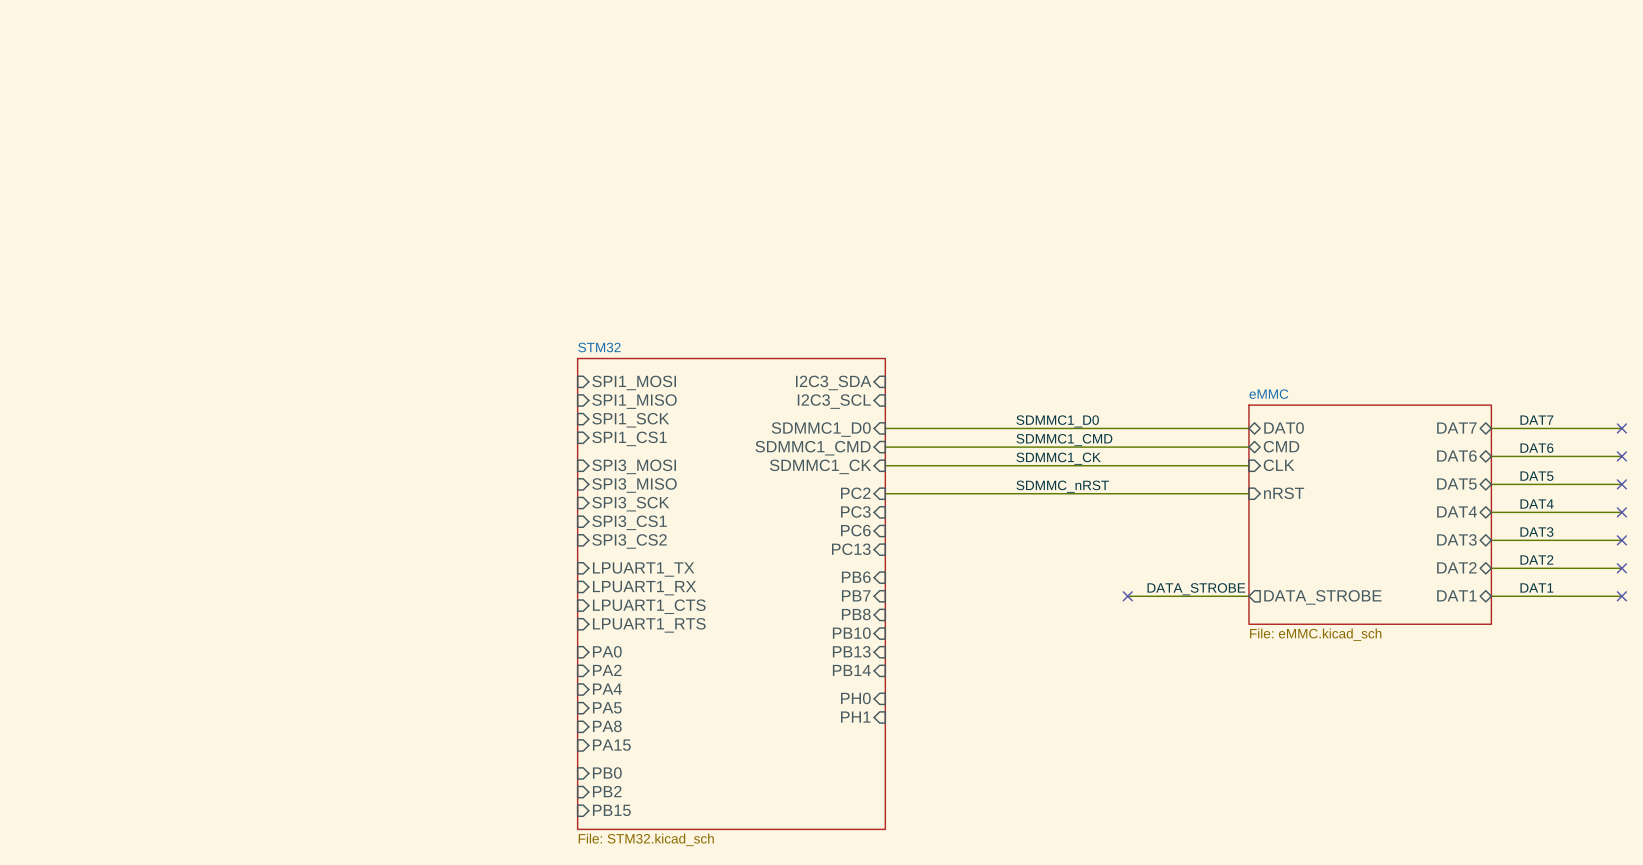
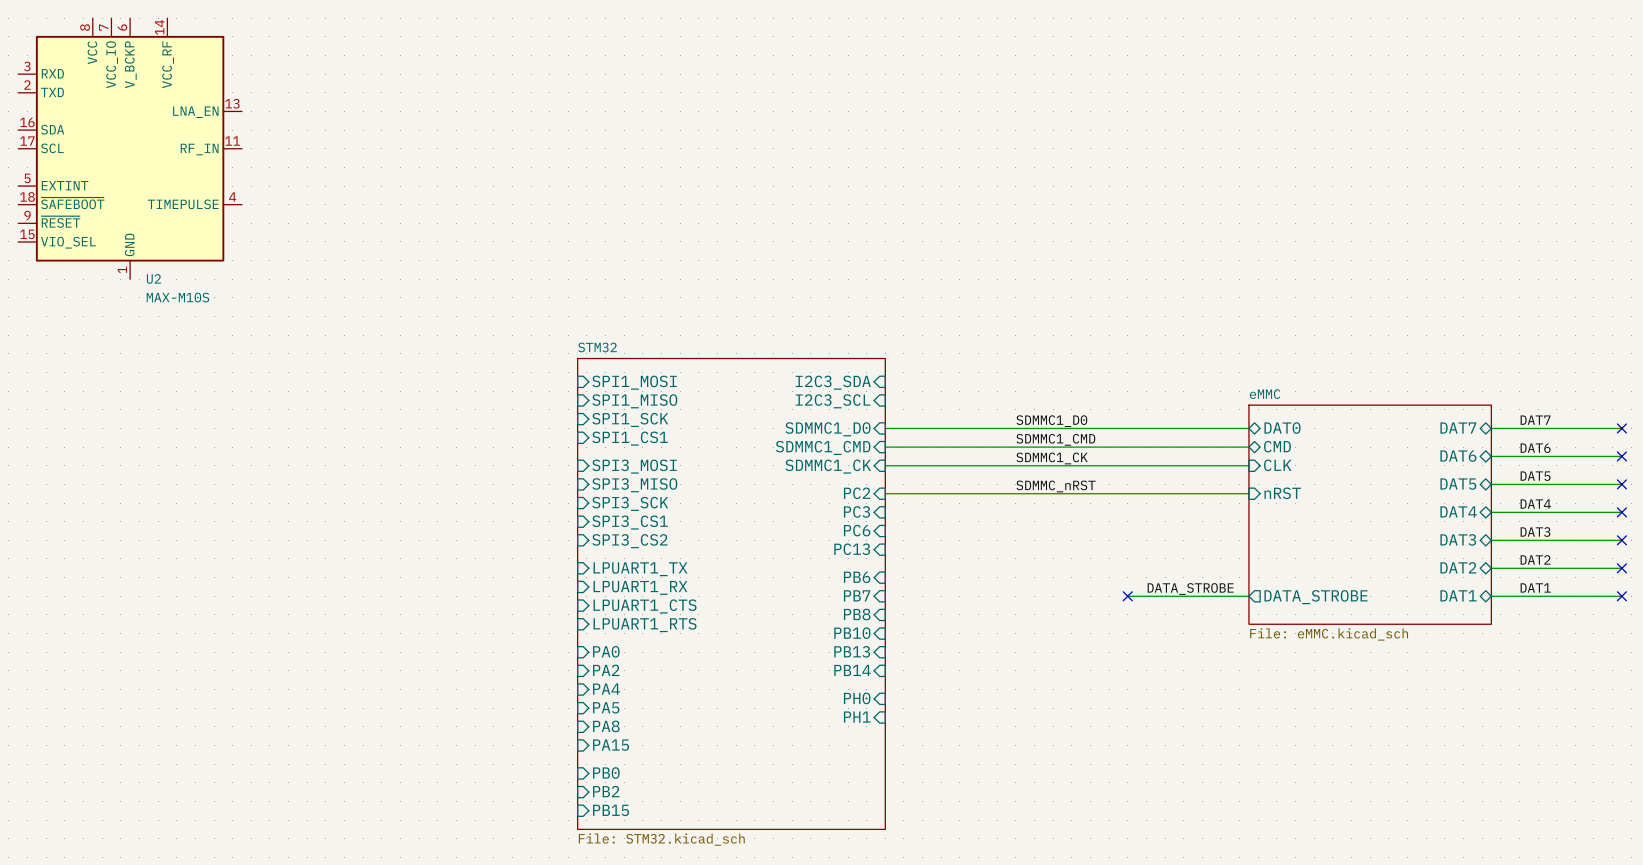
U2: none -> MAX-M10S (130, 148)

